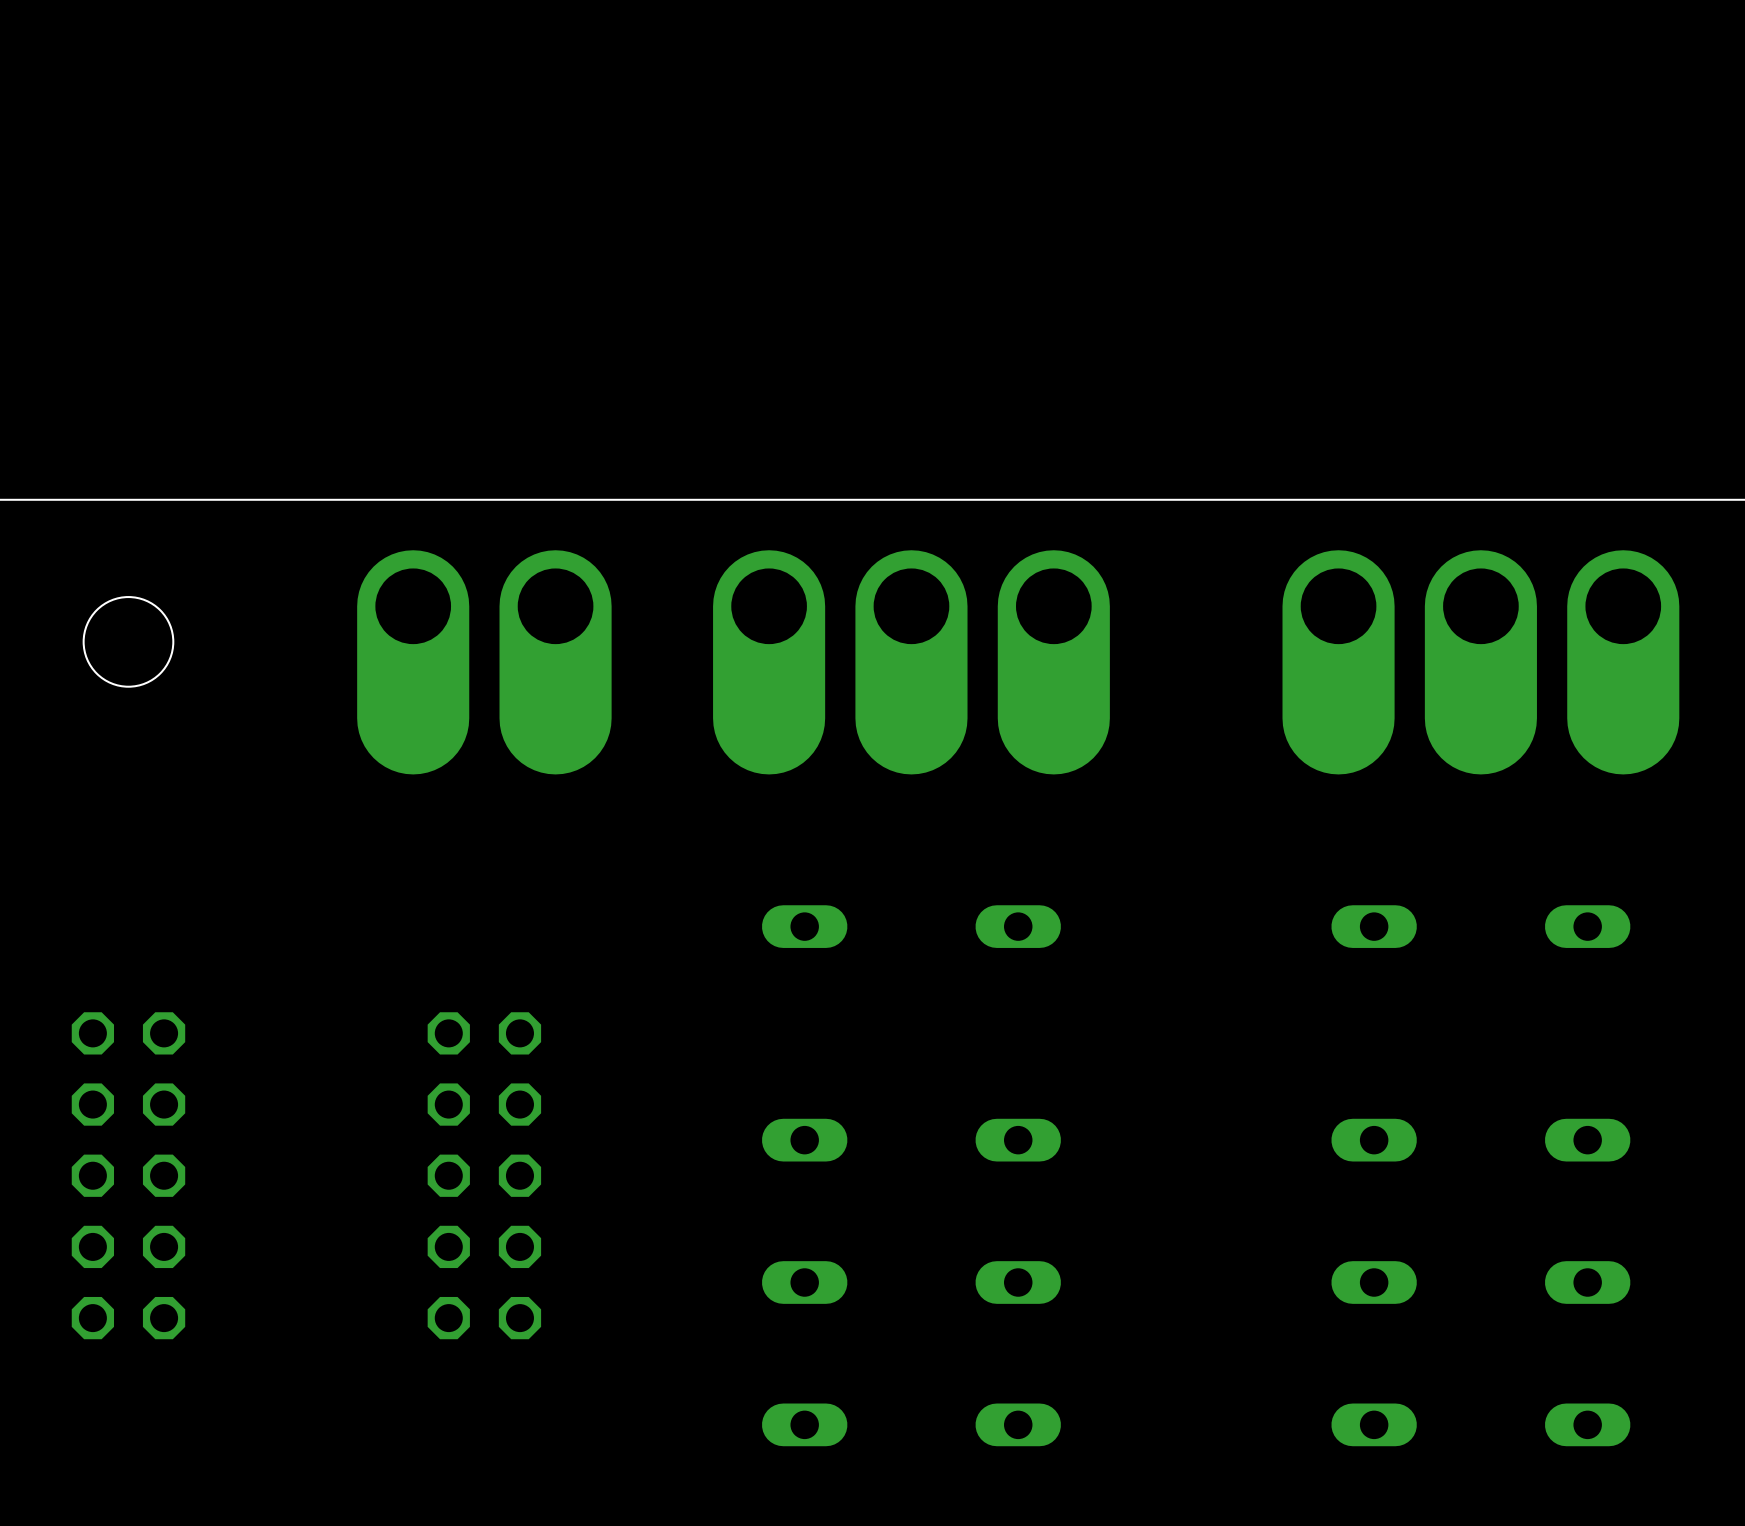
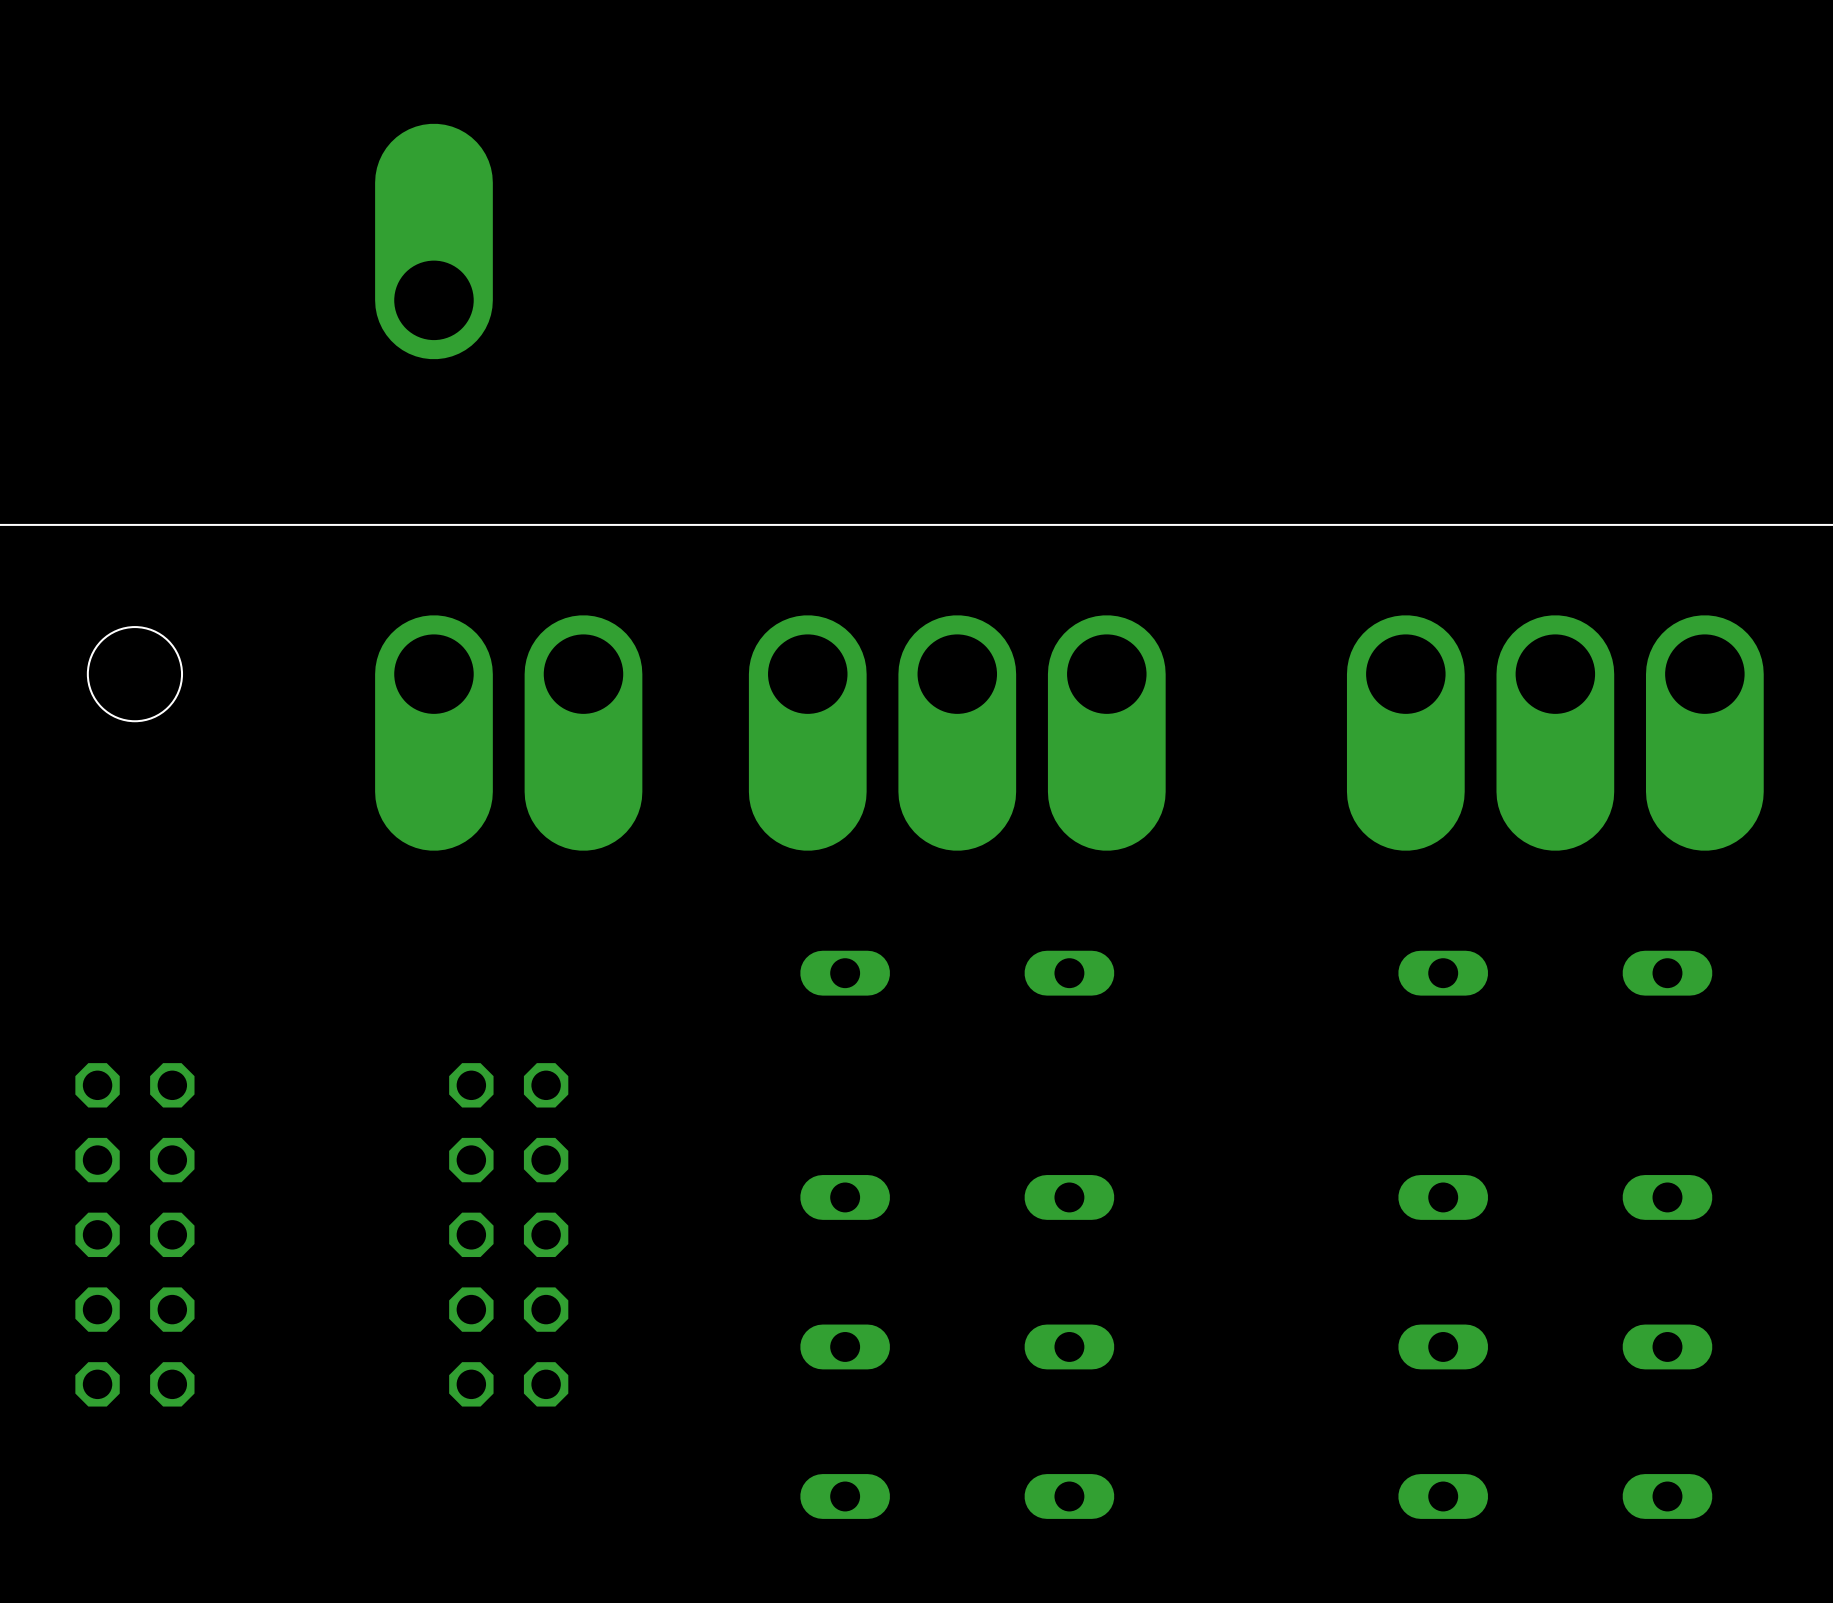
part: none -> (433, 241)
part position: (413, 662) -> (433, 733)
part position: (555, 662) -> (583, 733)
part position: (769, 662) -> (807, 733)
part position: (911, 662) -> (957, 733)
part position: (1053, 662) -> (1106, 733)
part position: (1338, 662) -> (1405, 733)
part position: (1480, 662) -> (1555, 733)
part position: (1623, 662) -> (1704, 733)

